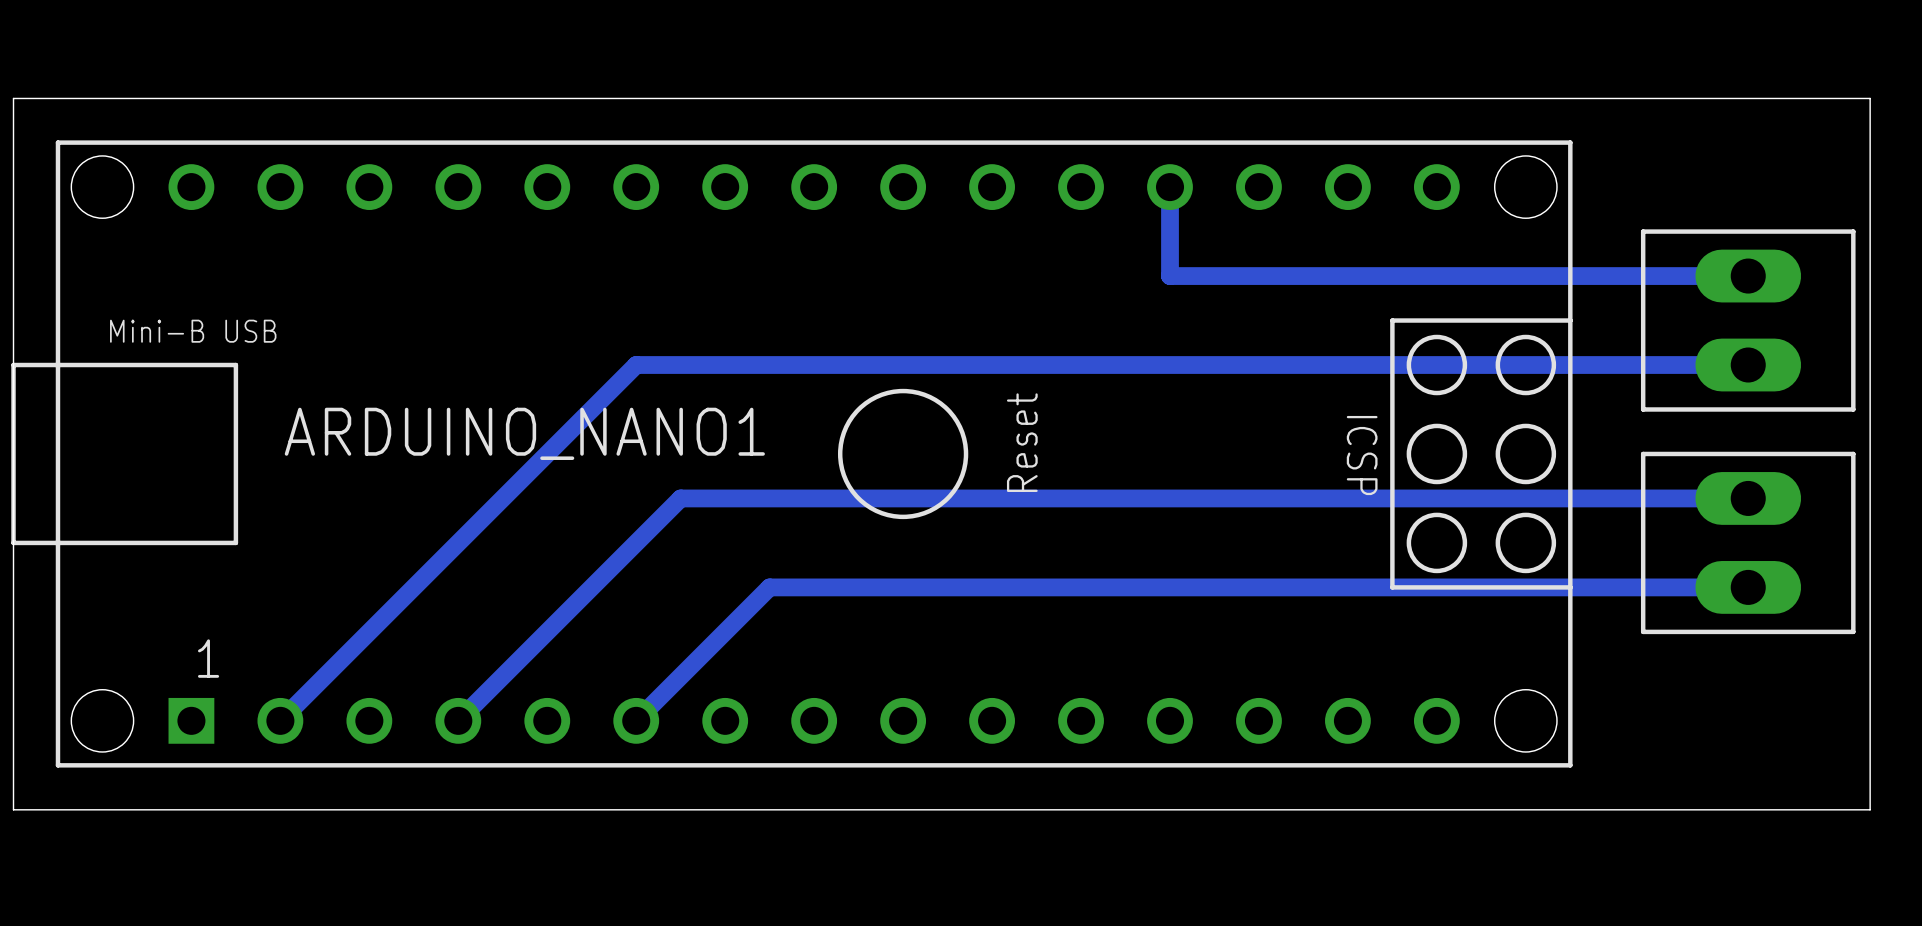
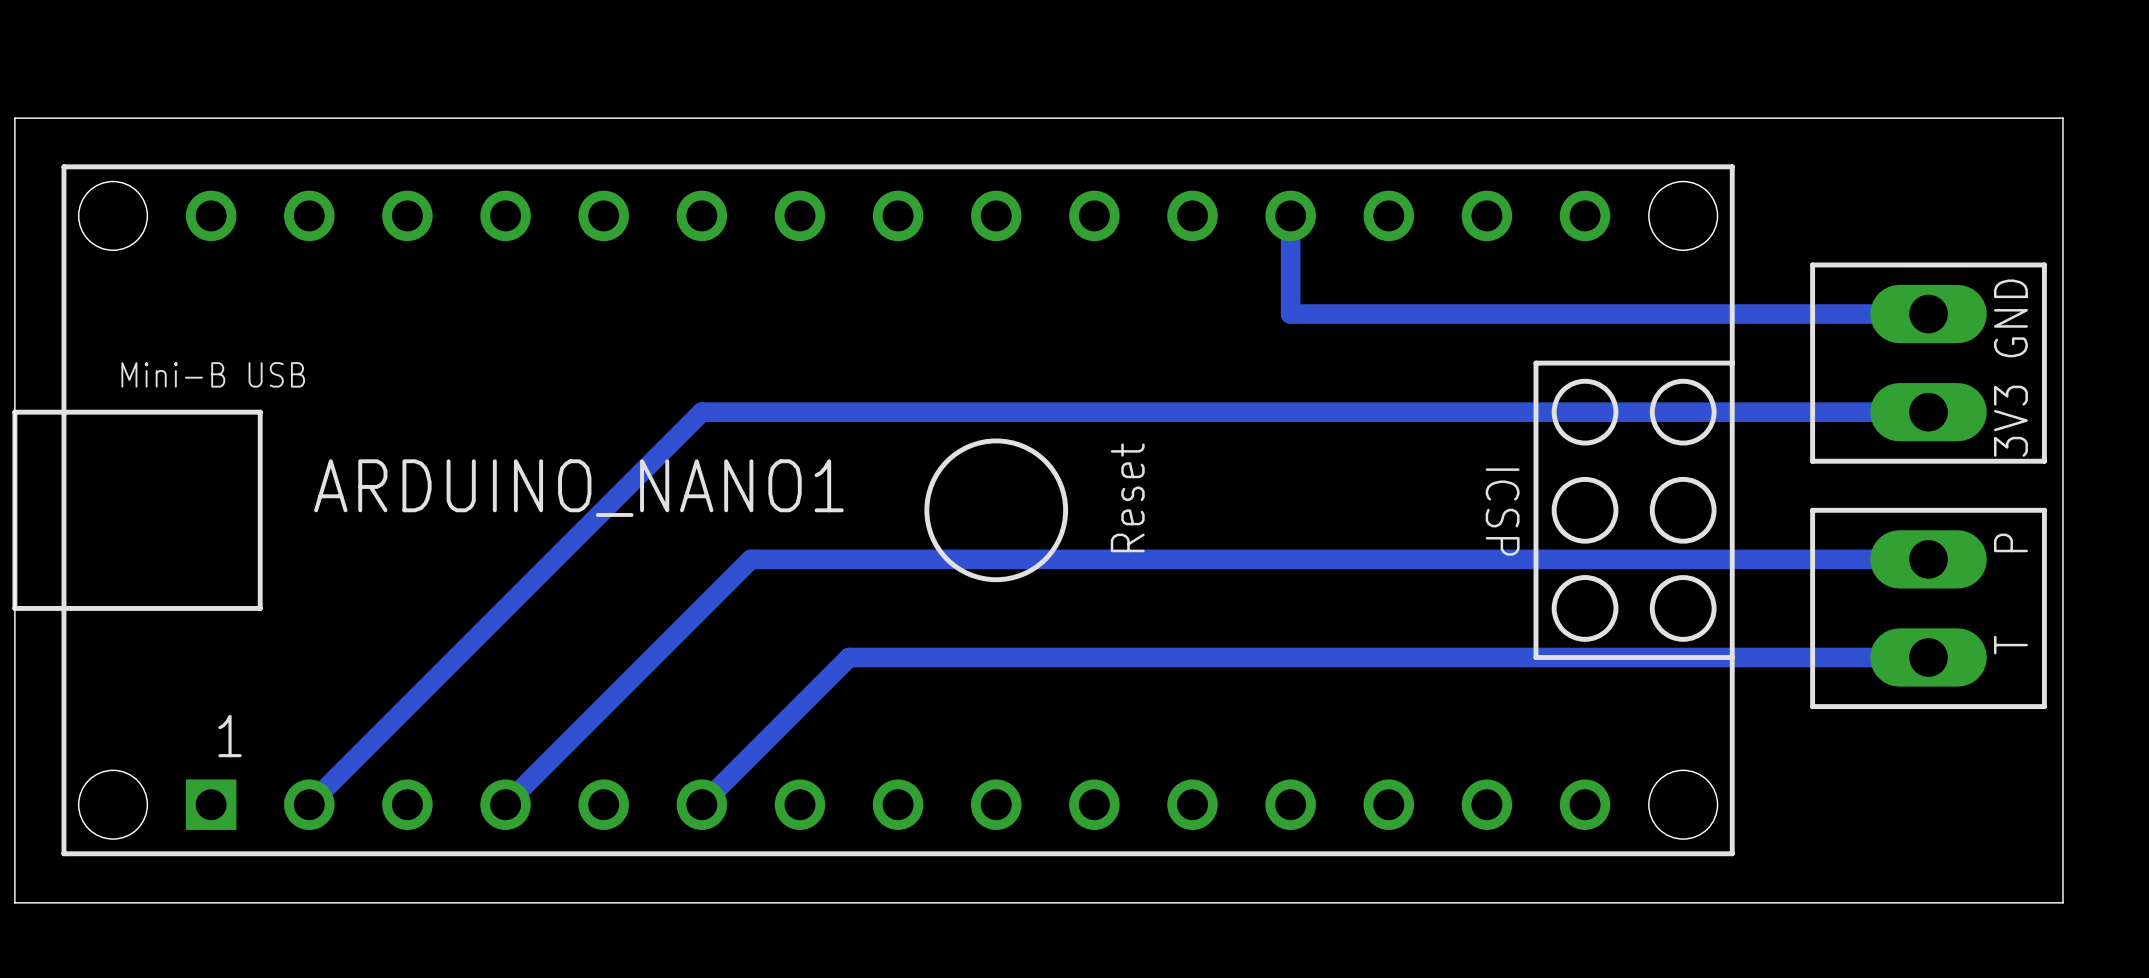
text: none -> GND (2010, 318)
text: none -> 3V3 (2010, 421)
text: none -> P (2010, 542)
text: none -> T (2010, 645)

